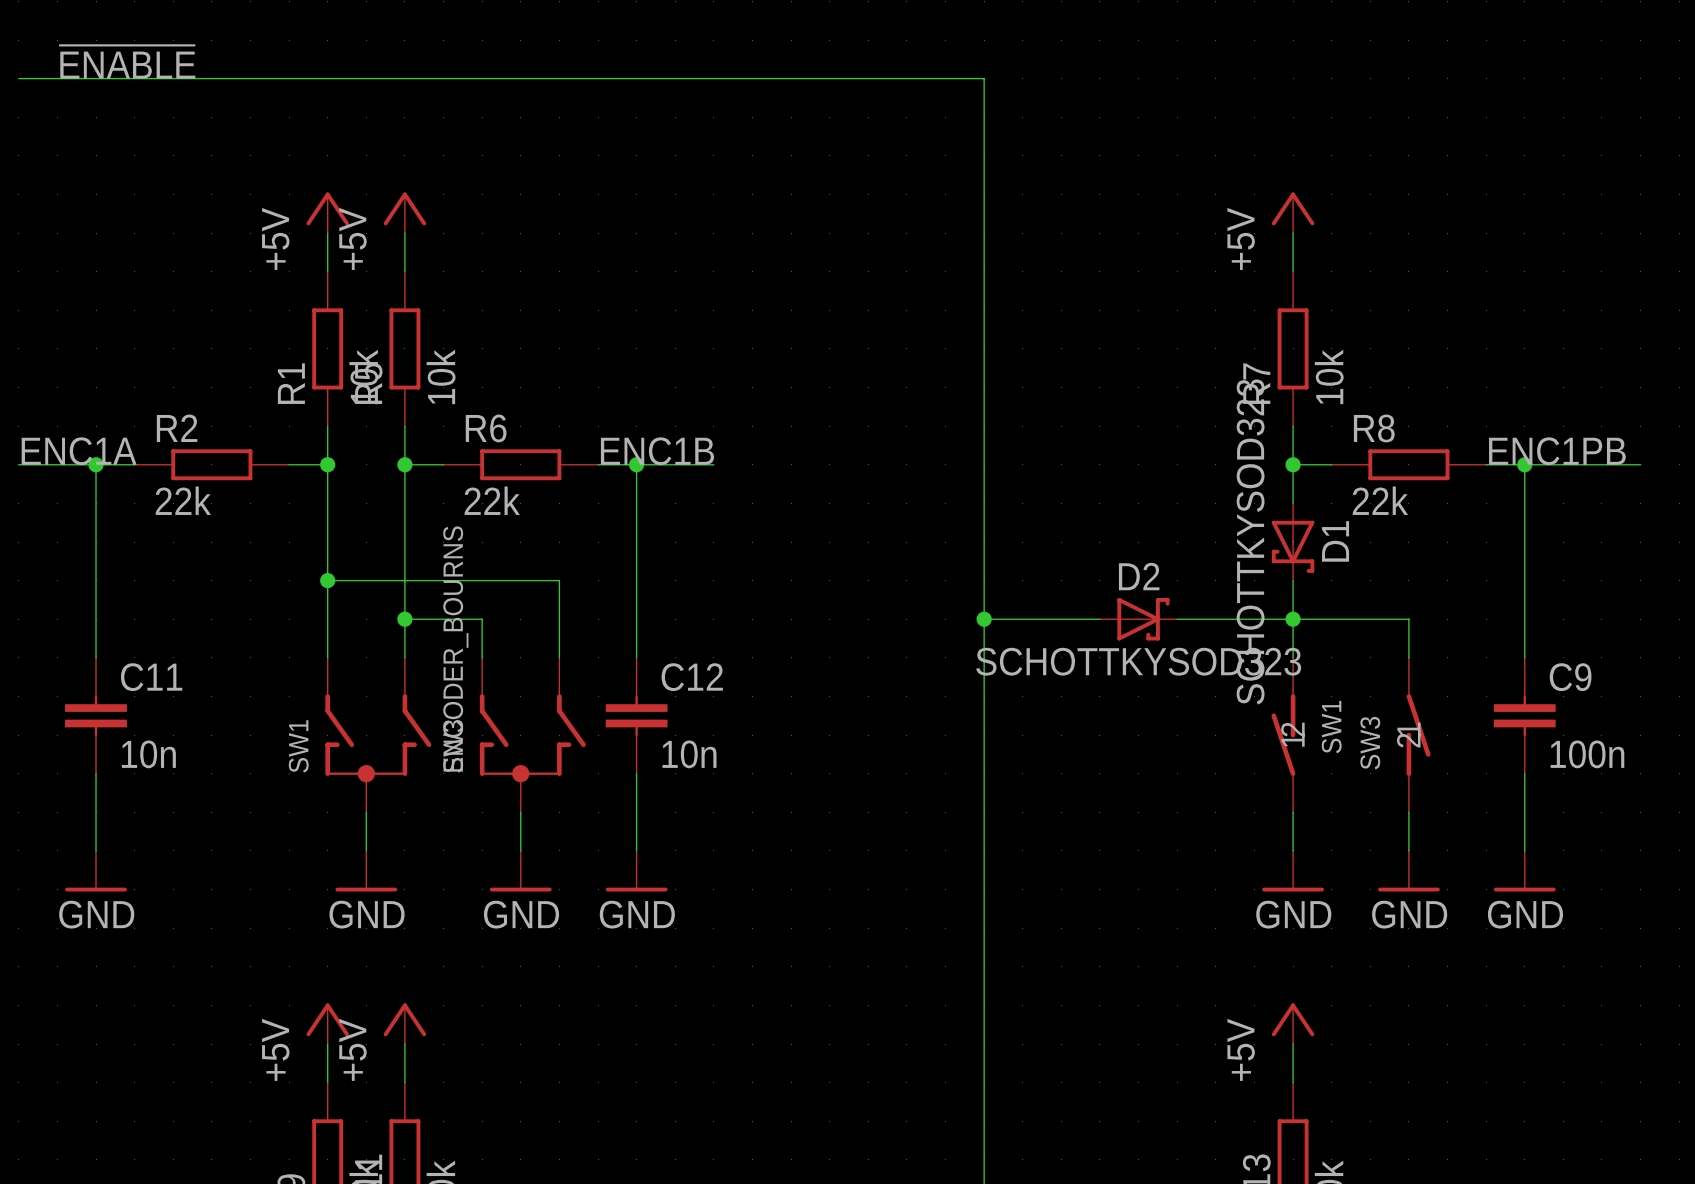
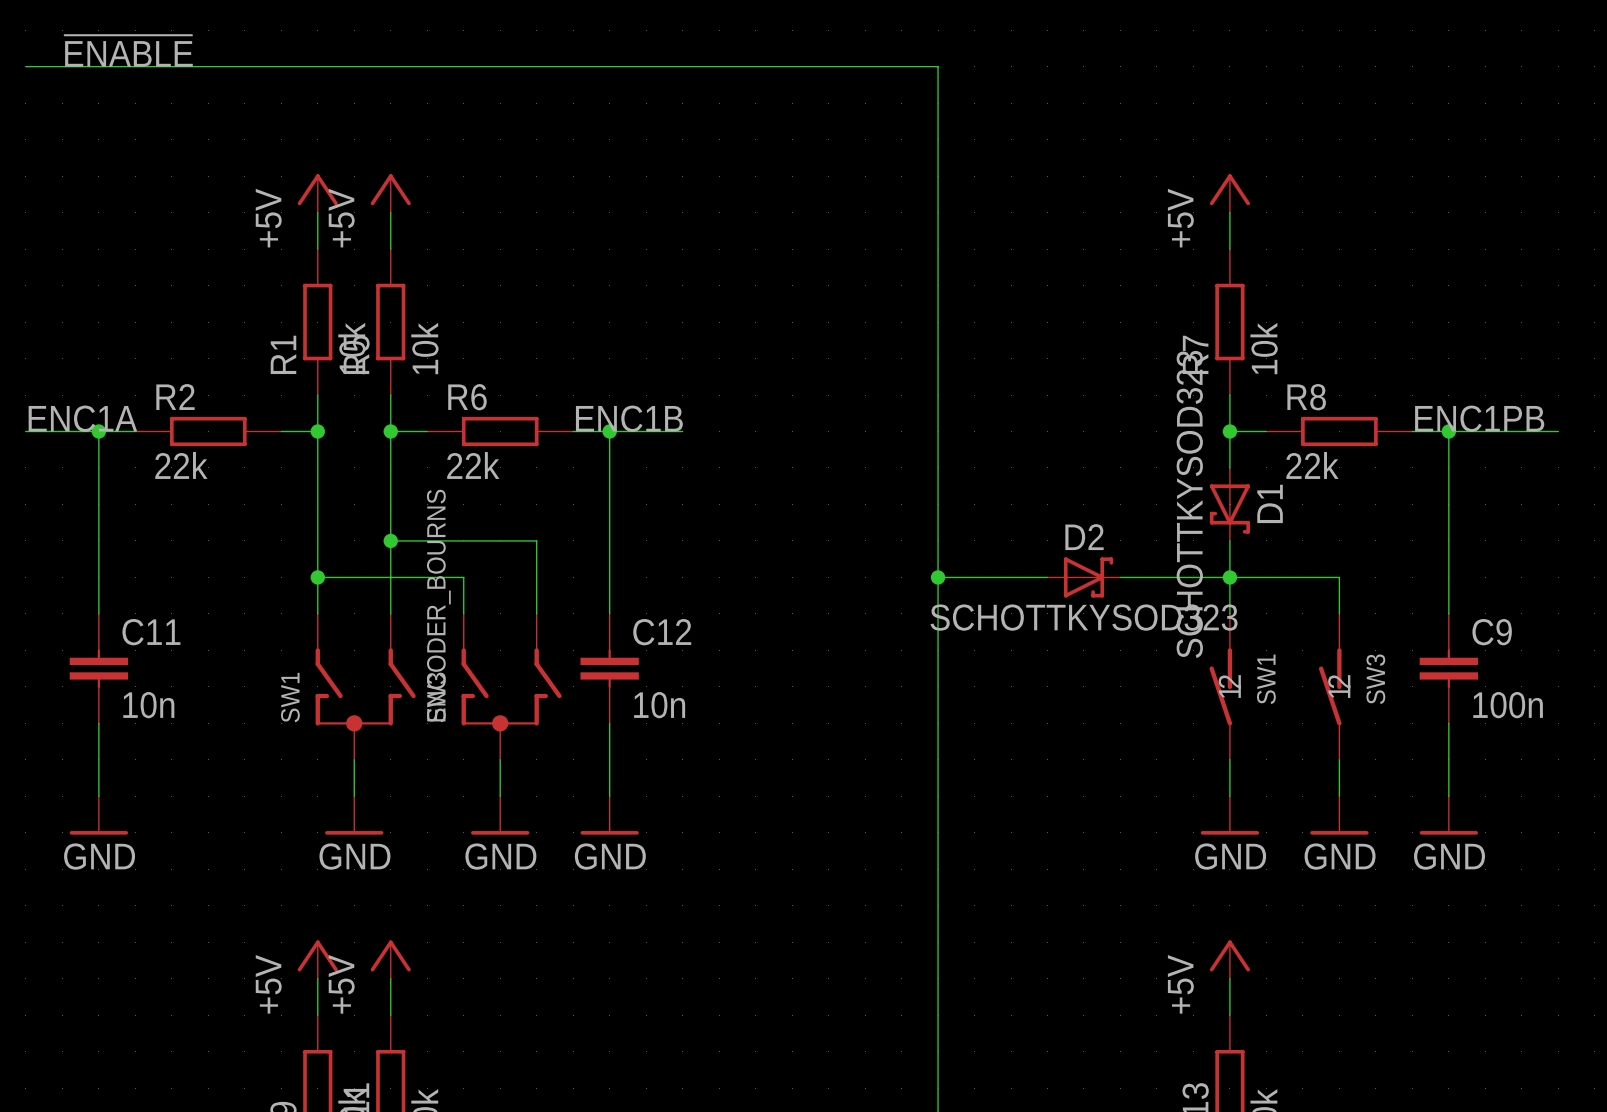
wire: (327, 580) (404, 580) -> (317, 577) (390, 577)
junction: (327, 580) -> none
junction: none -> (390, 540)
junction: none -> (317, 577)
junction: (404, 619) -> none
SW3 rotation: 0° (1418, 735) -> 180° (1330, 686)

